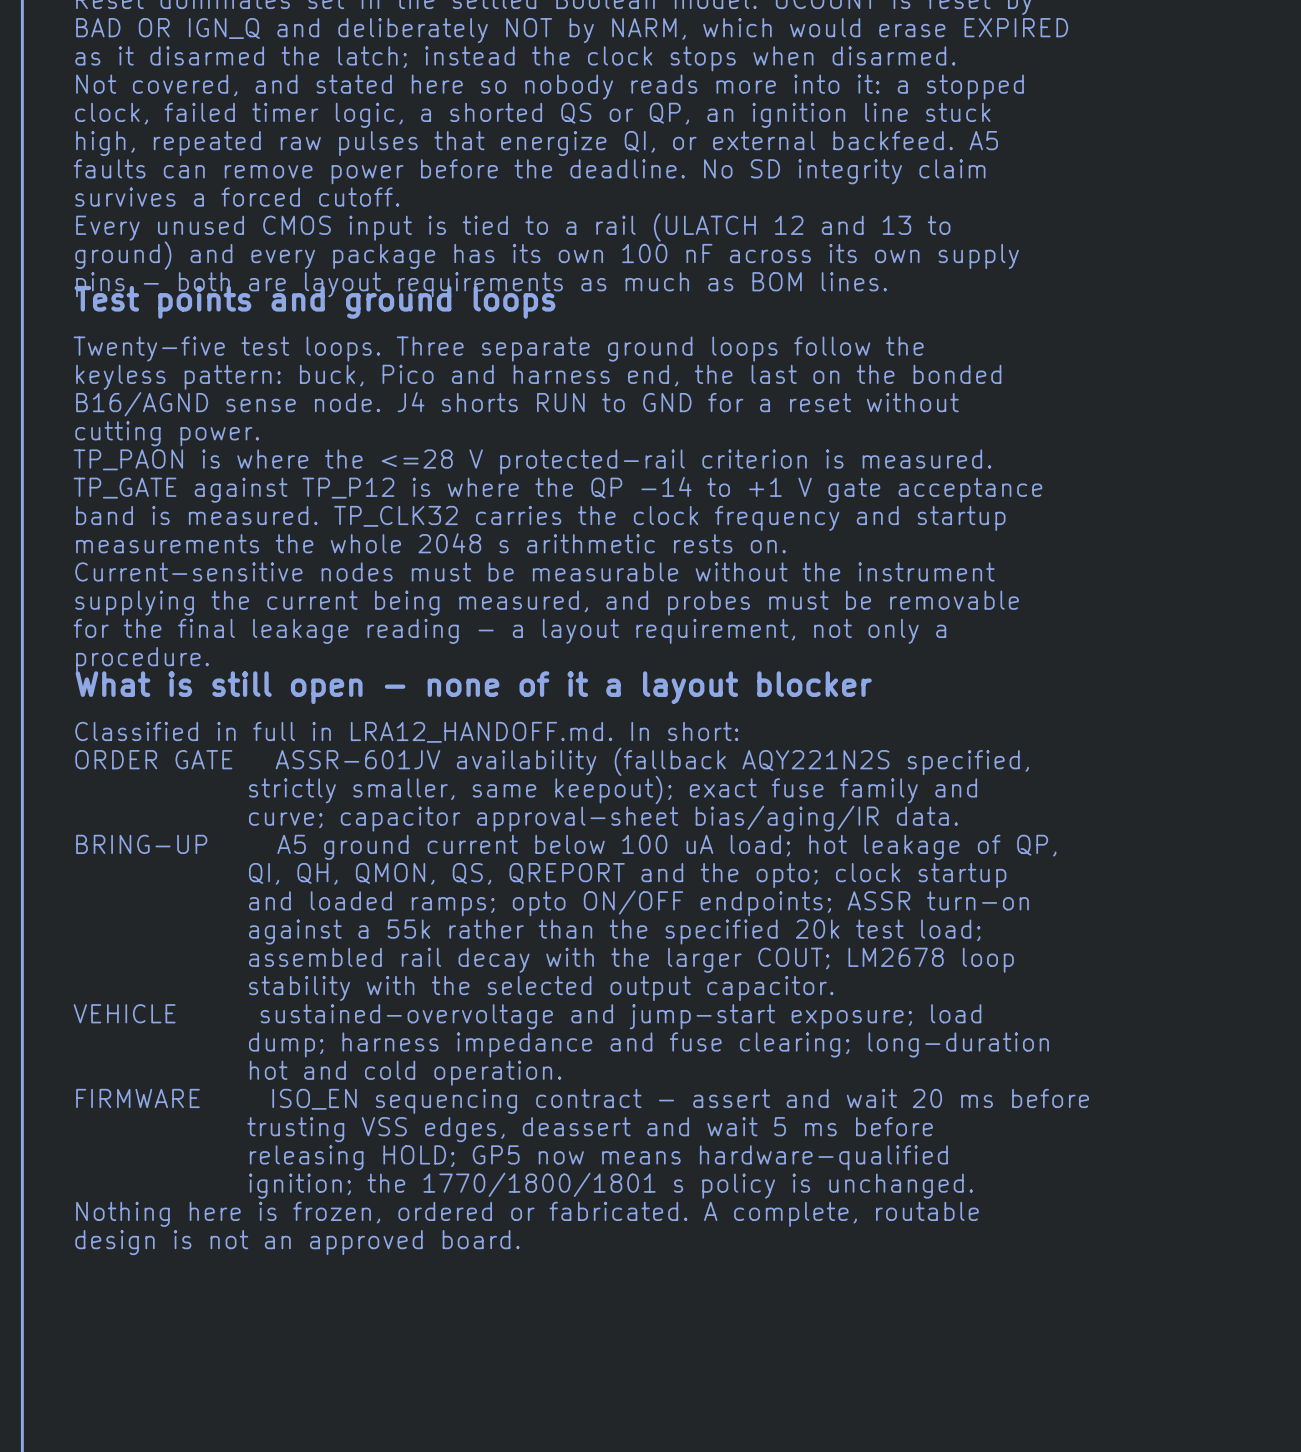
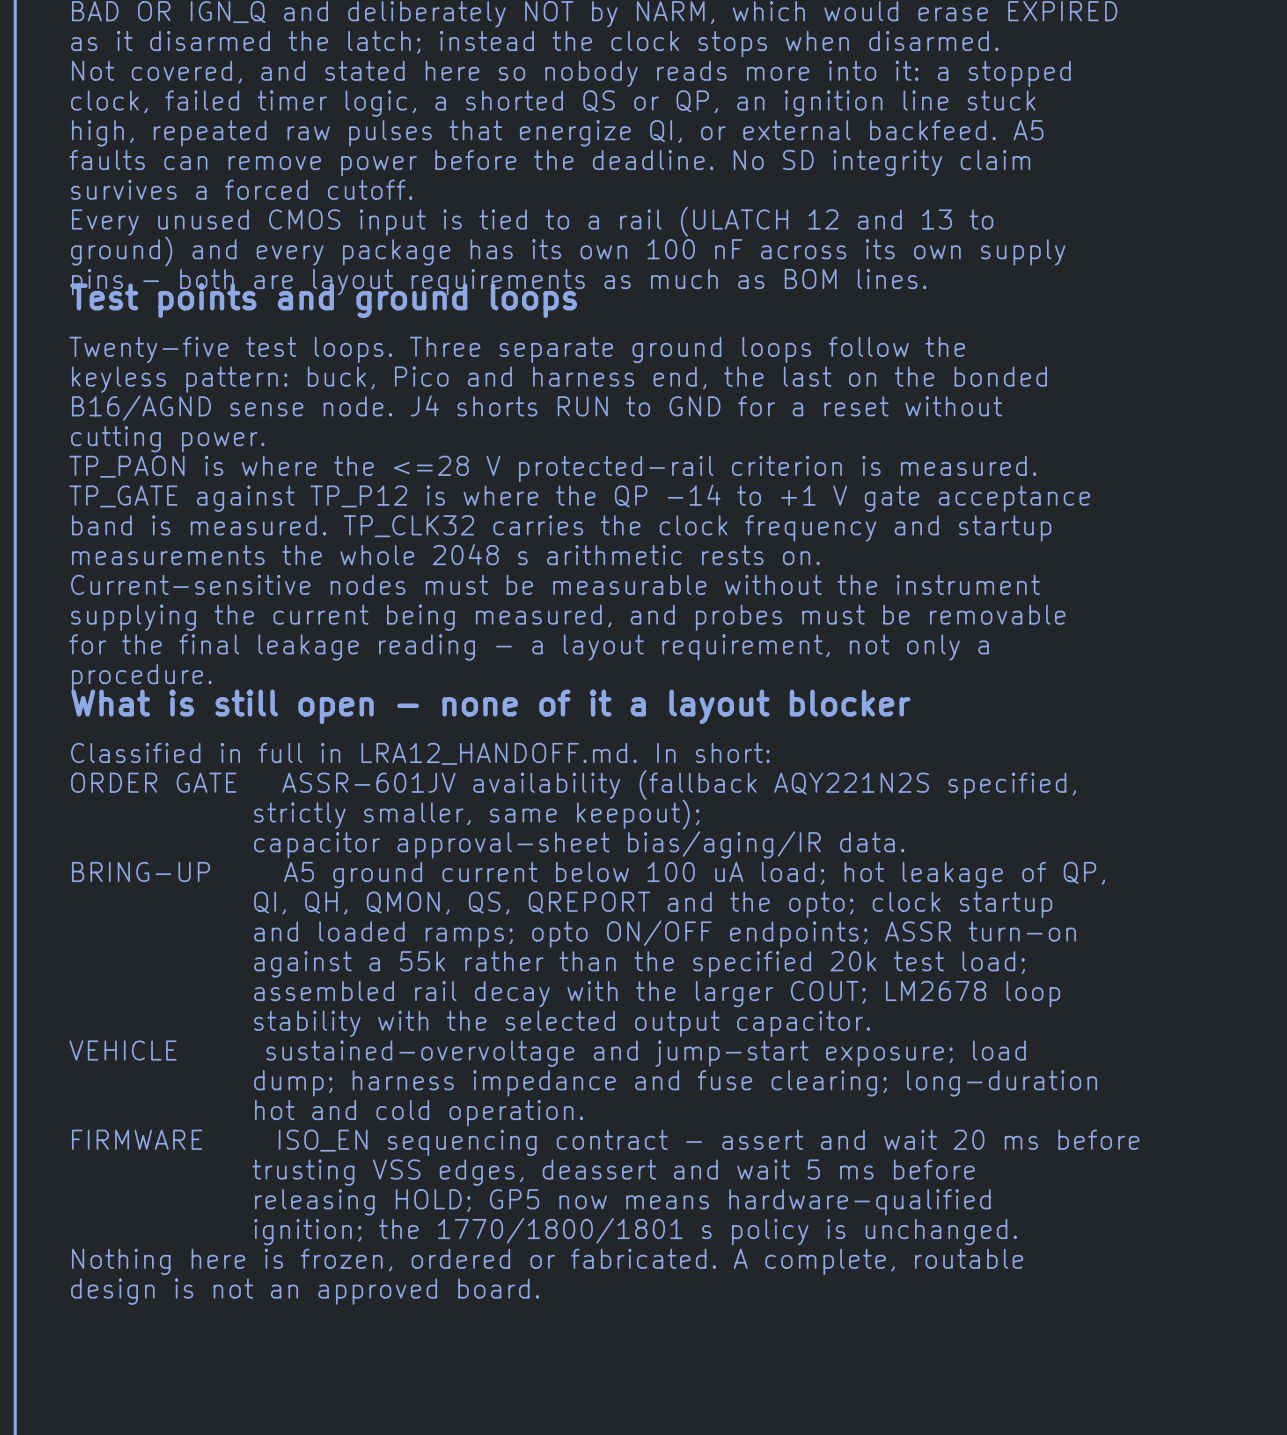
text: strictly smaller, same keepout); exact fuse family and (613, 790) -> strictly smaller, same keepout); (476, 814)
text: curve; capacitor approval-sheet bias/aging/IR data. (603, 818) -> capacitor approval-sheet bias/aging/IR data. (579, 844)

